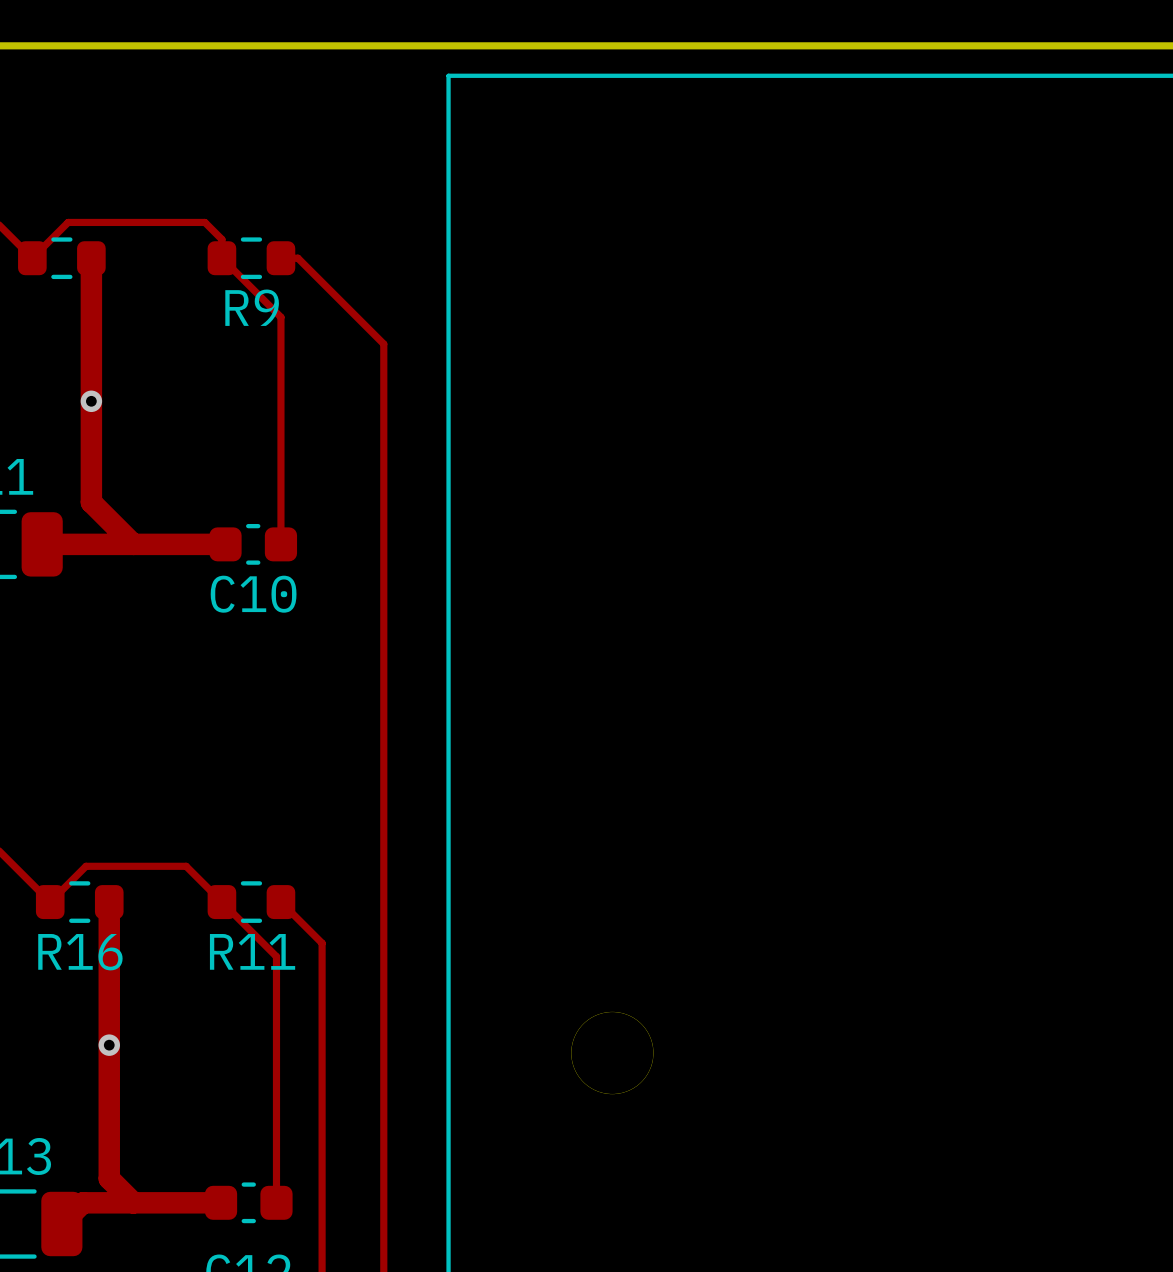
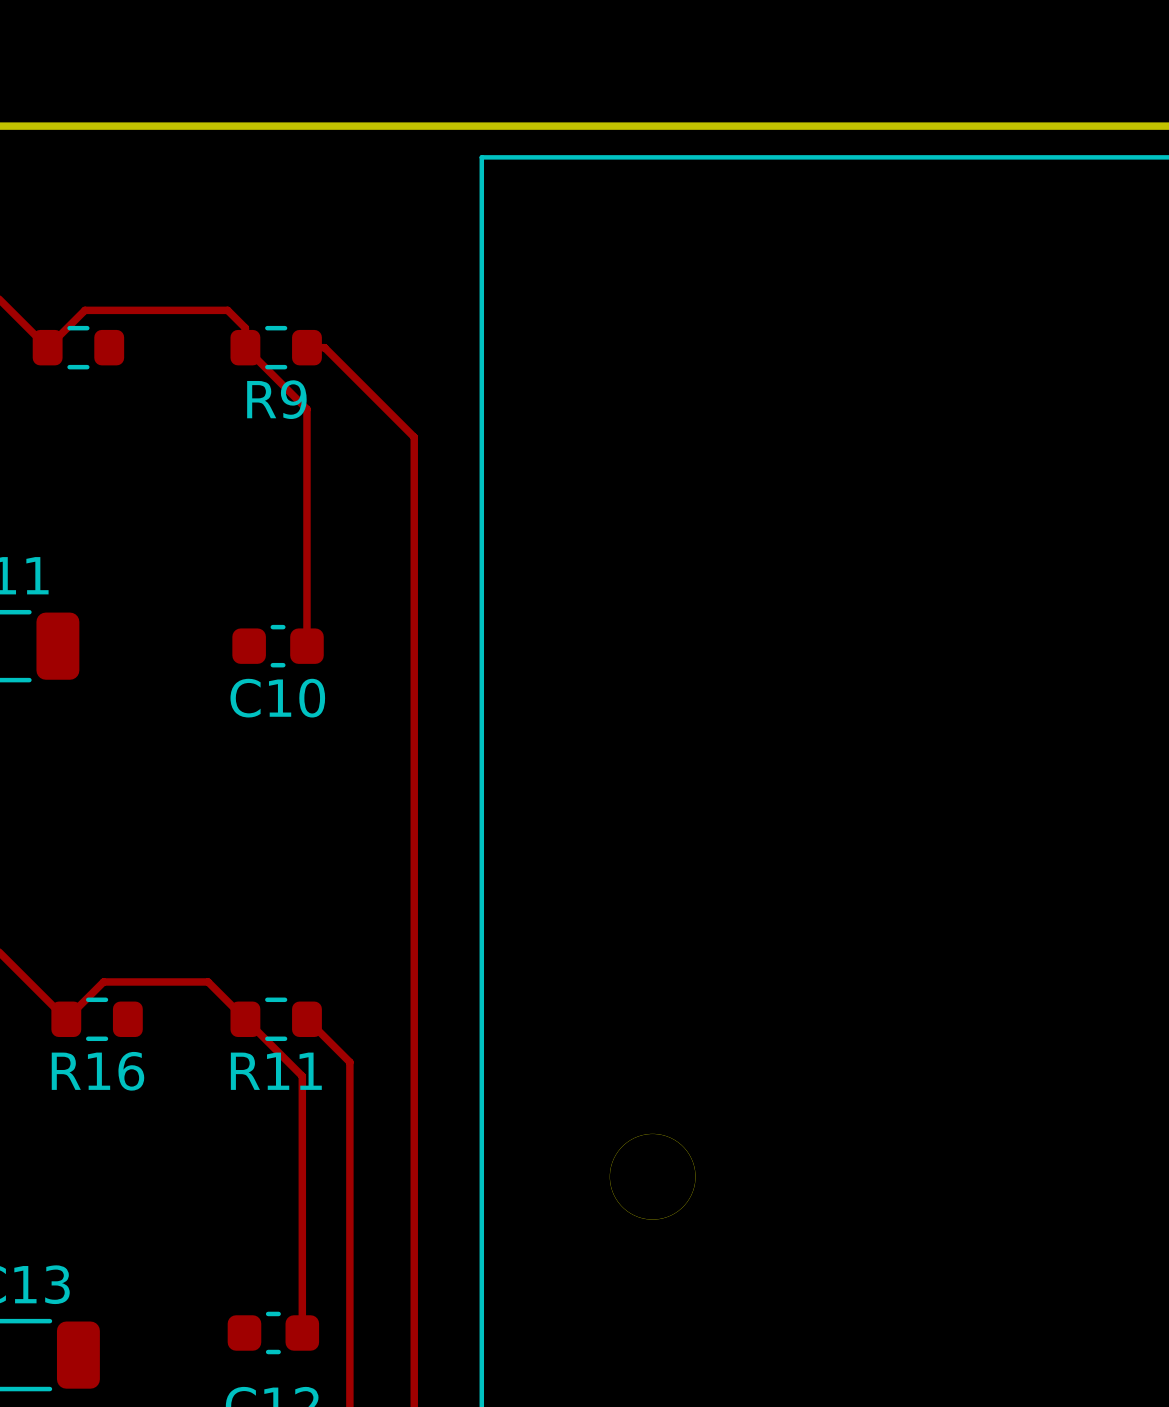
top track: (91, 258) (91, 502) (133, 544) -> none
via: (91, 401) -> none
top track: (42, 544) (225, 544) -> none
top track: (109, 902) (109, 1178) (133, 1202) -> none
via: (109, 1045) -> none
top track: (221, 1202) (83, 1202) (61, 1224) -> none

